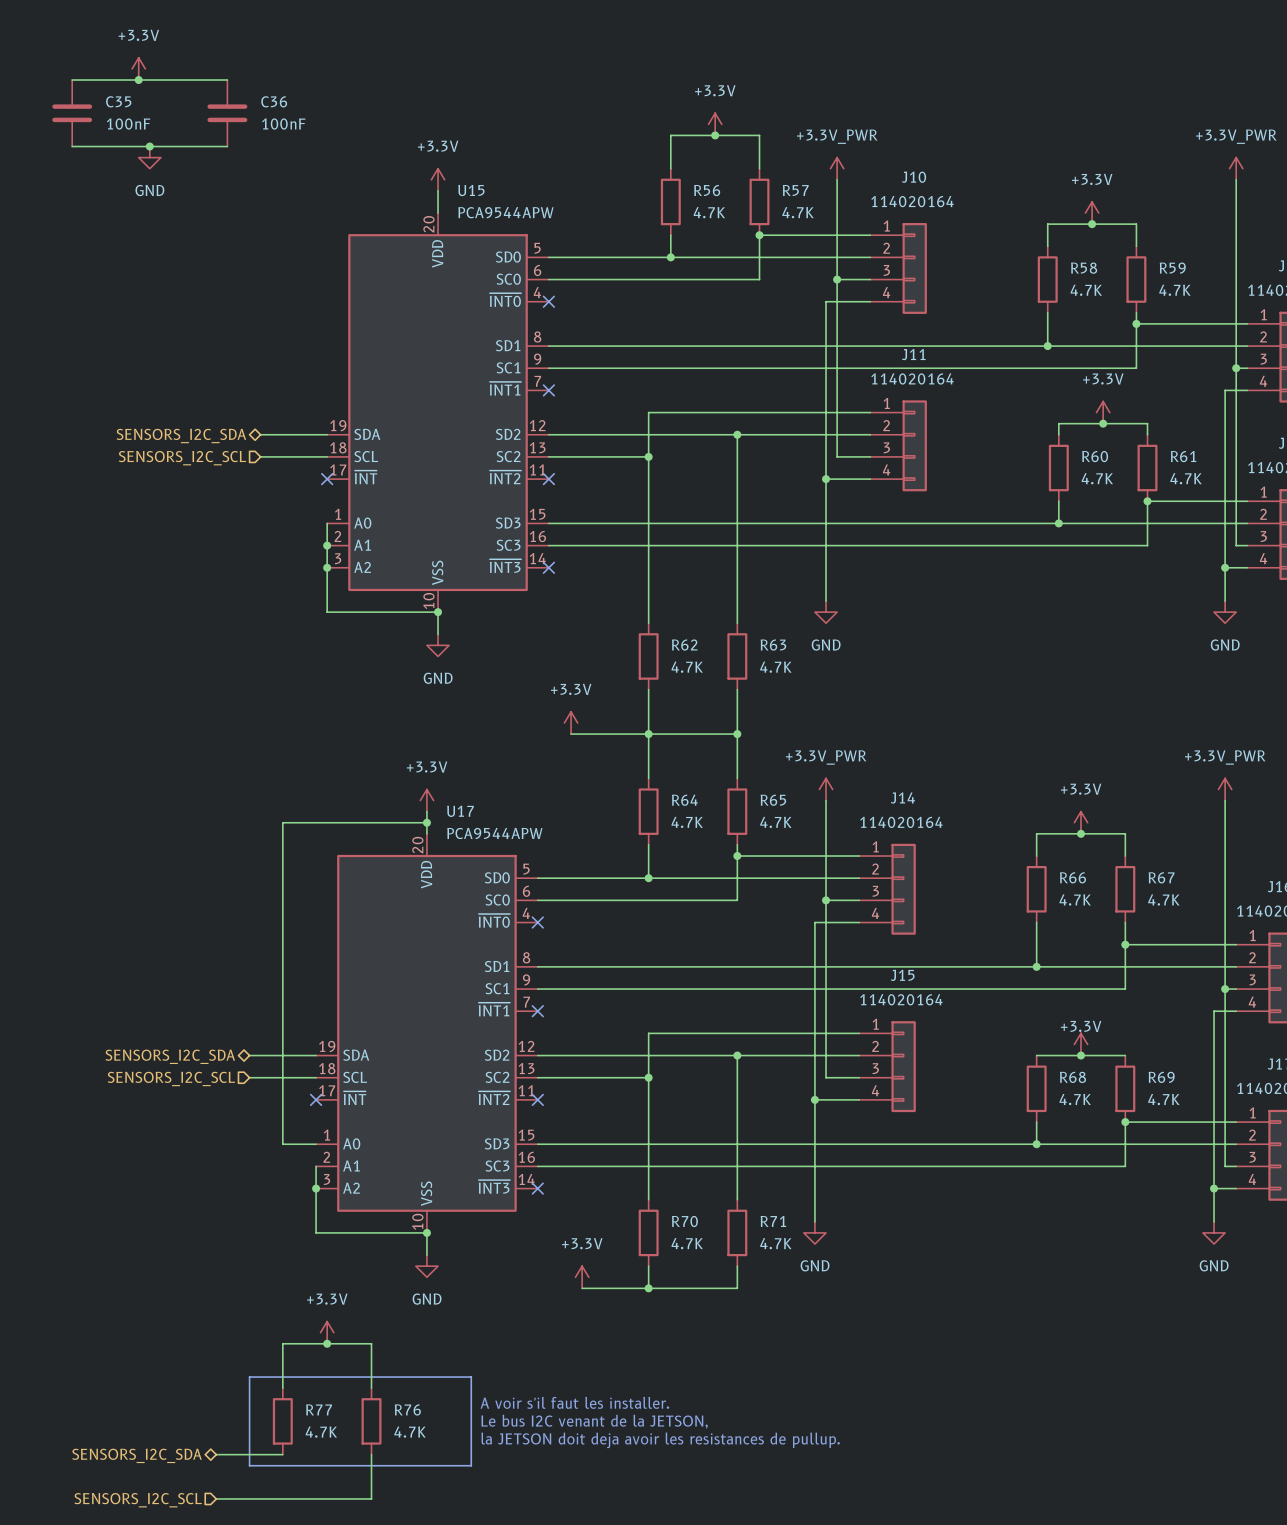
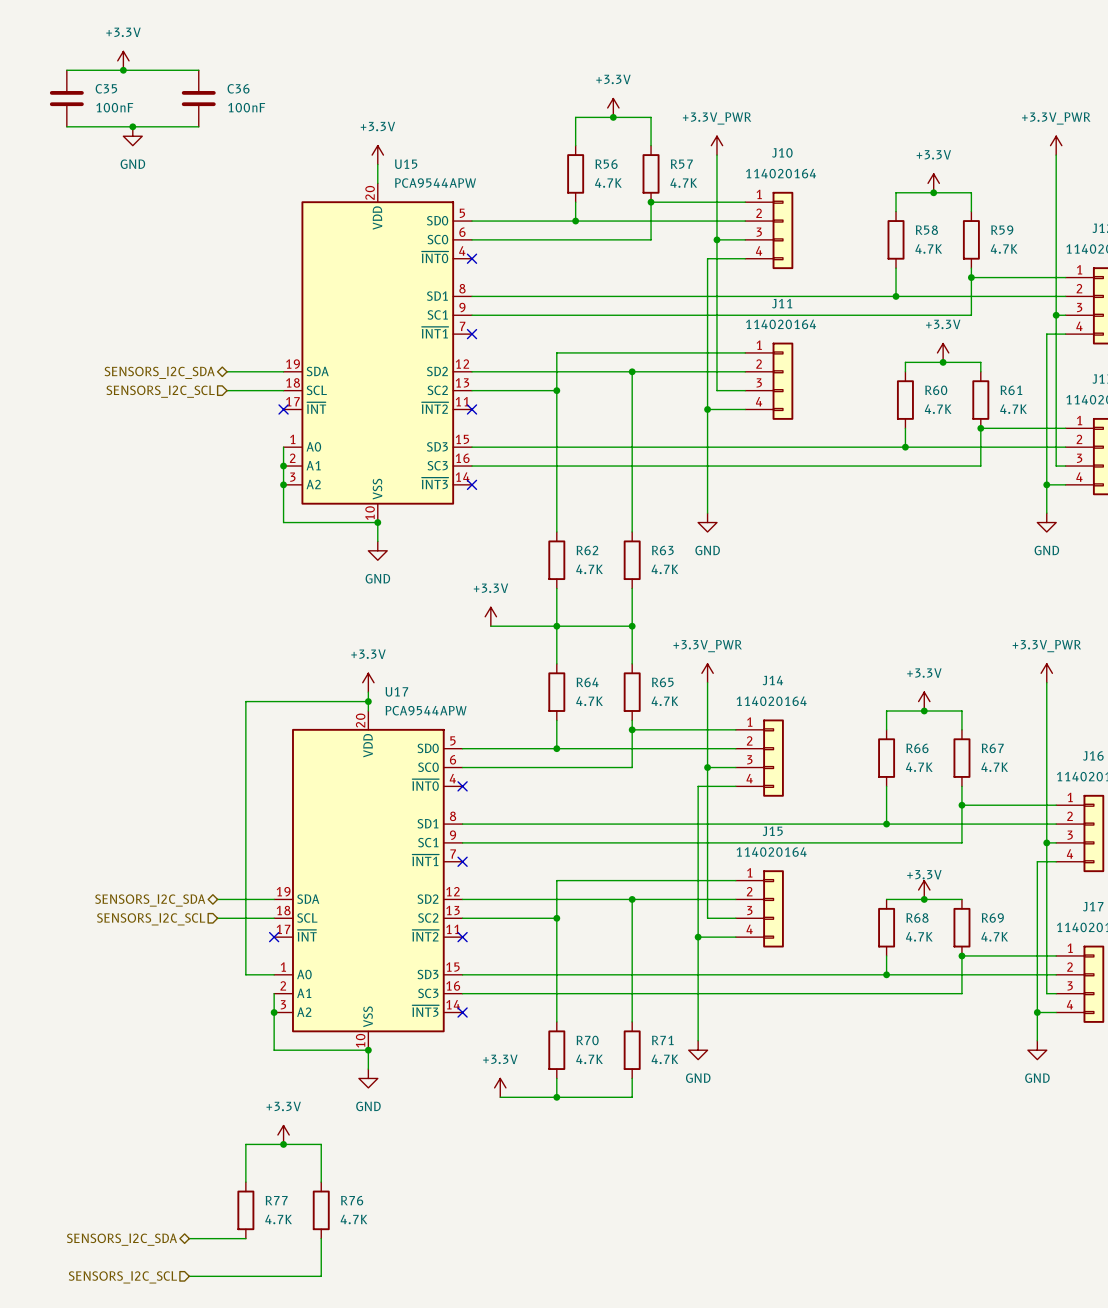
line: (249, 1377) (471, 1377) (471, 1465) (249, 1465) (249, 1377) -> none
text: A voir s'il faut les installer. (574, 1402) -> none
text: Le bus I2C venant de la JETSON, (594, 1421) -> none
text: la JETSON doit deja avoir les resistances de pullup. (660, 1440) -> none

